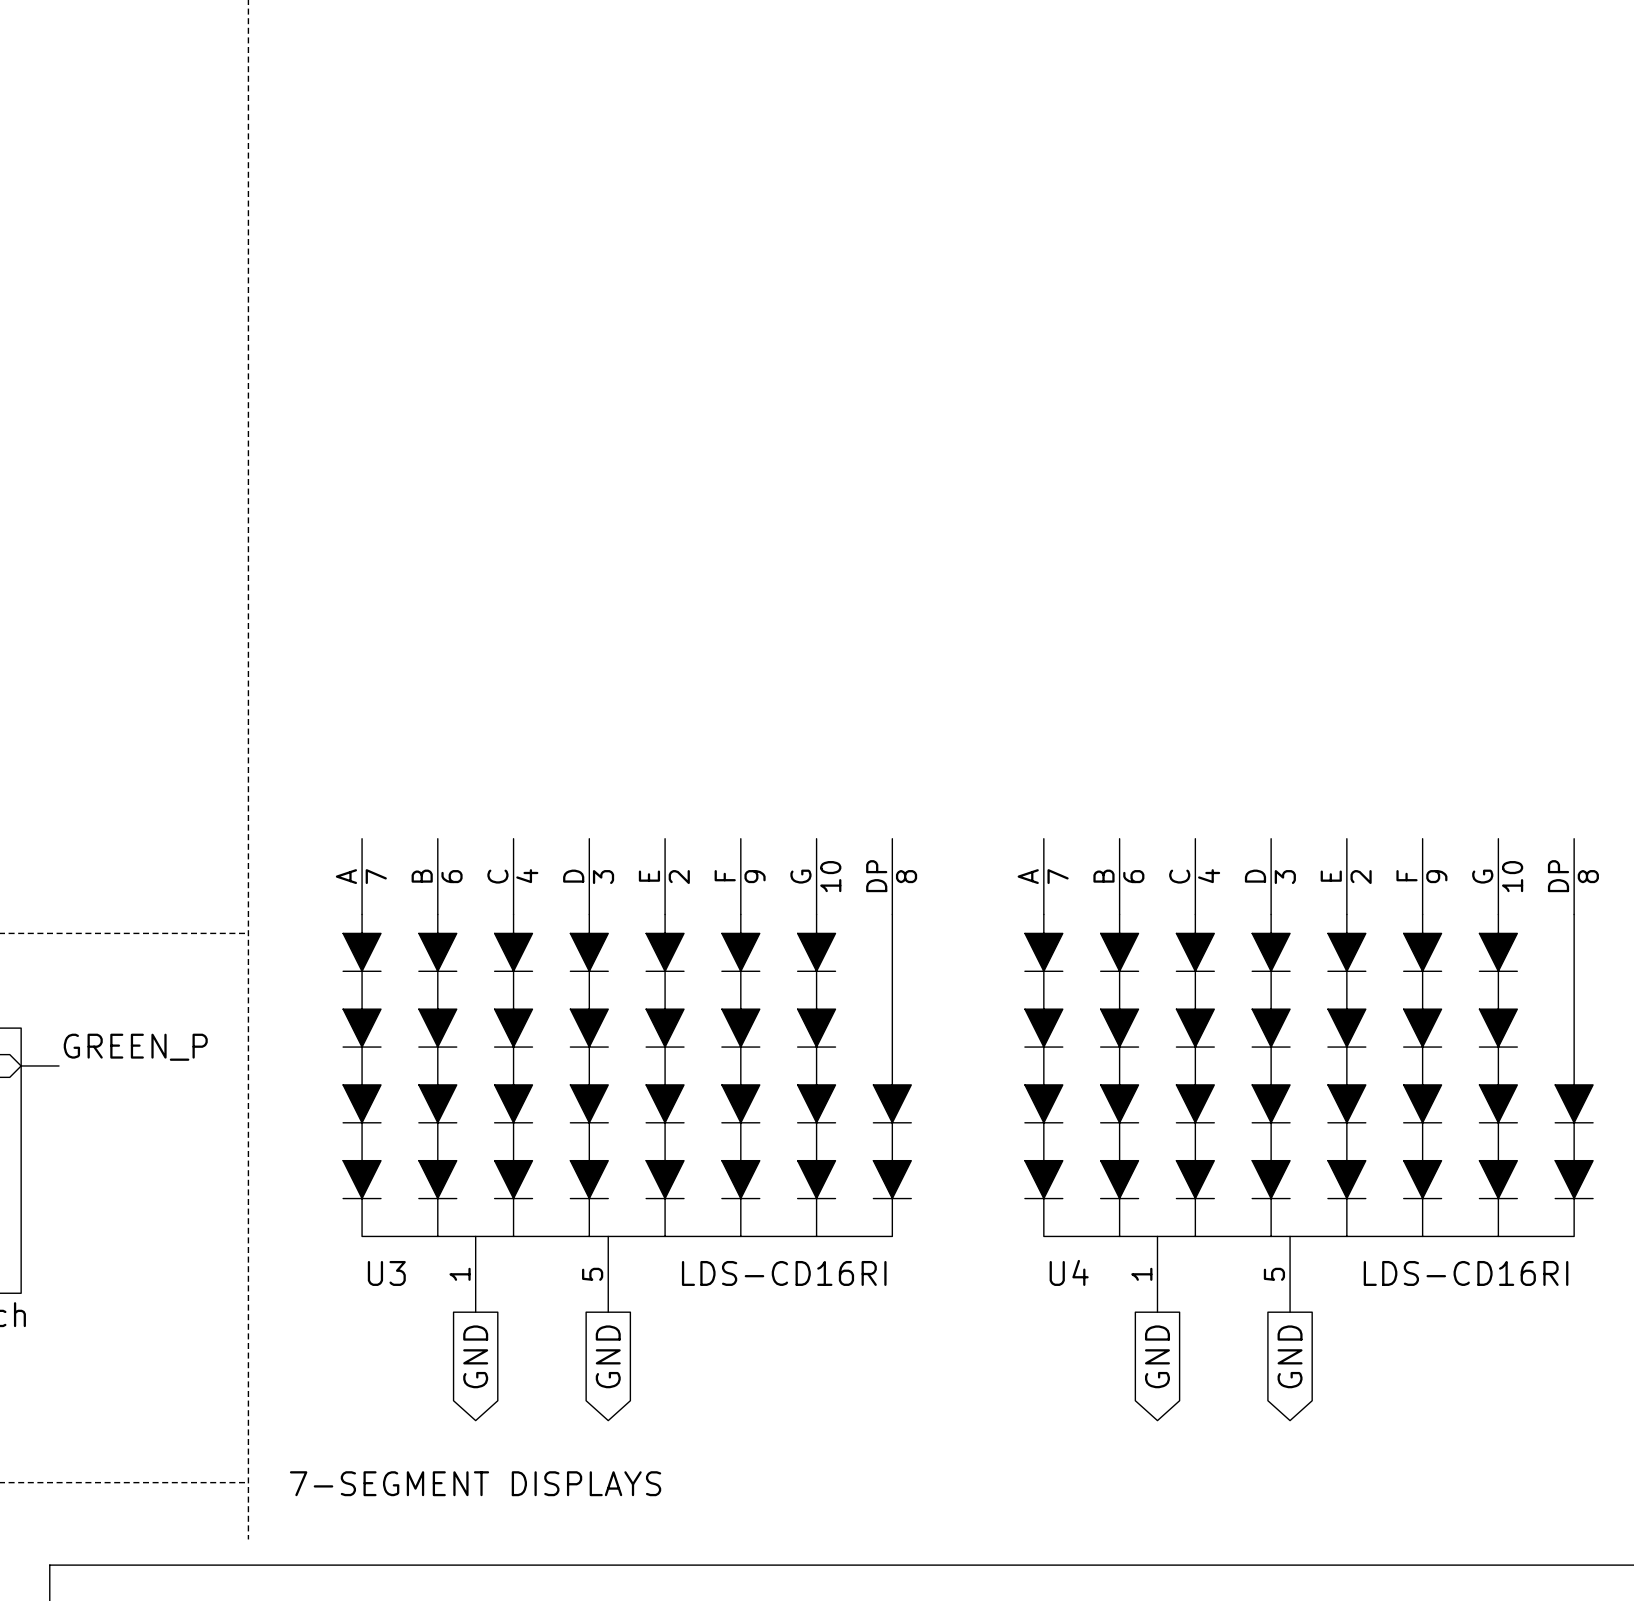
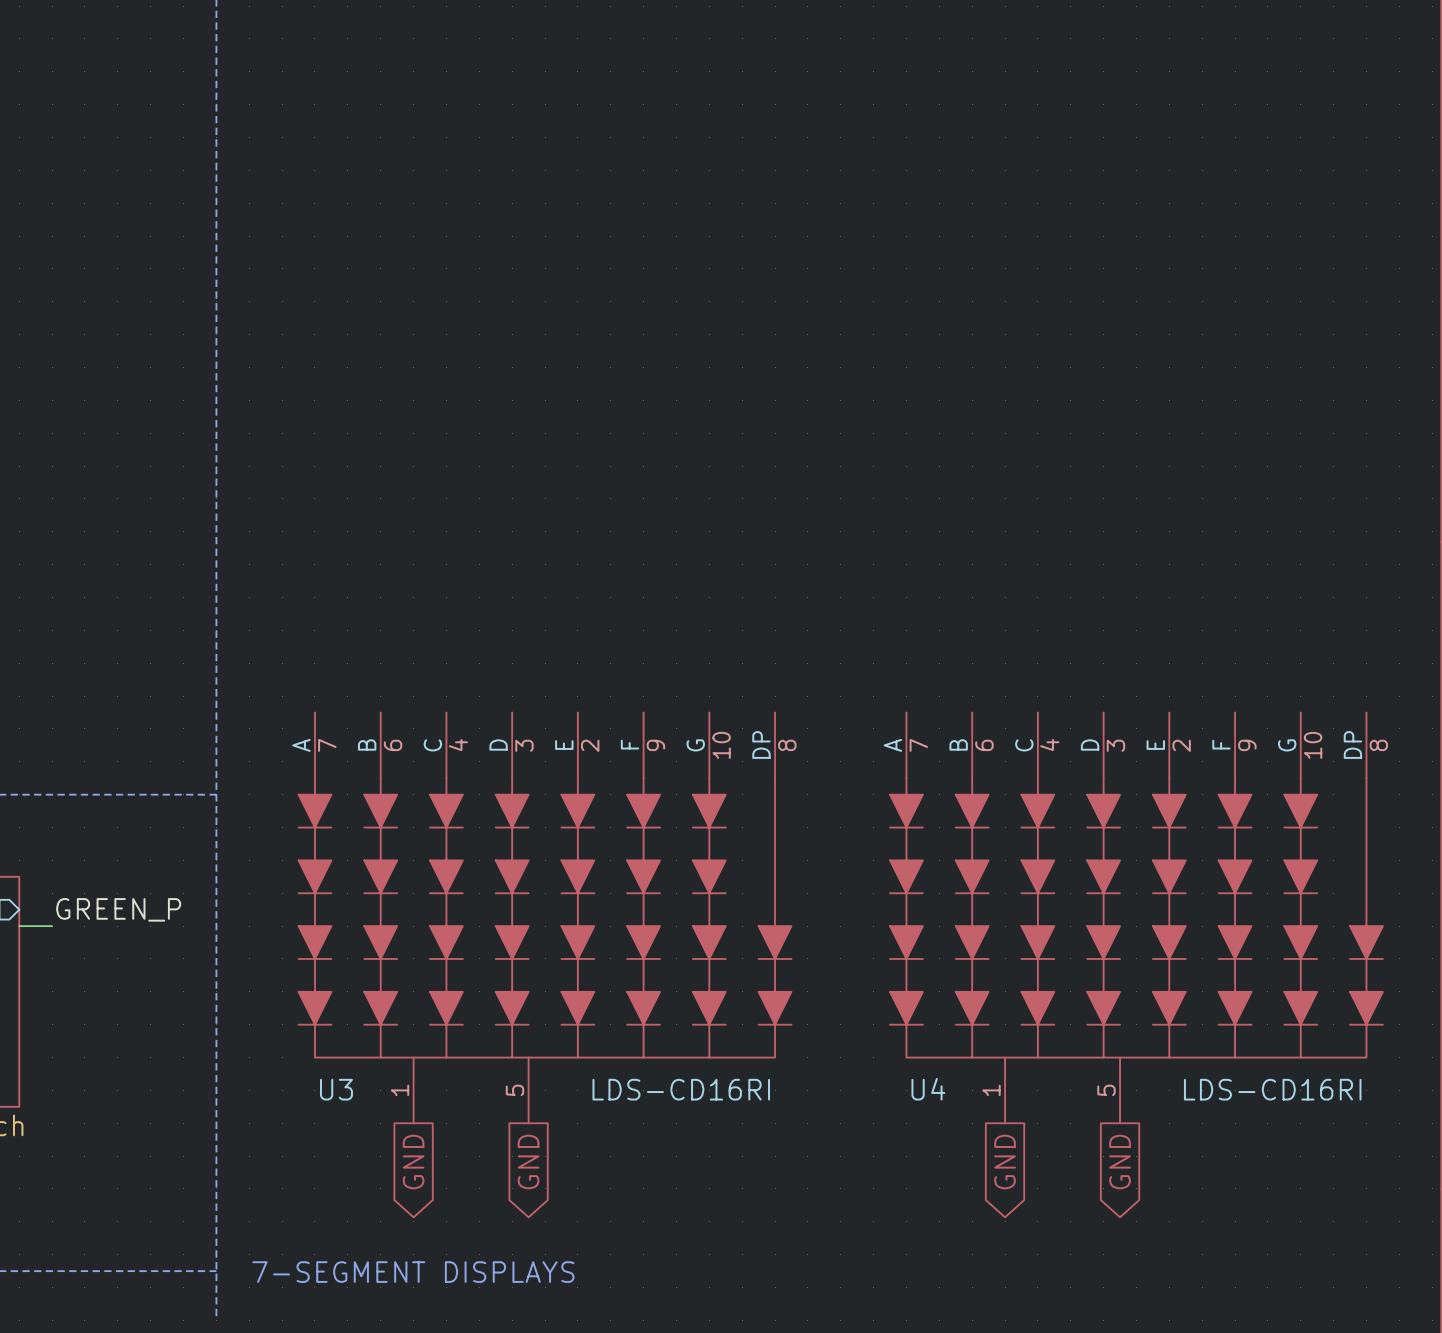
label position: GREEN_P (135, 1047) -> GREEN_P (118, 909)
wire: (21, 1065) (59, 1065) -> (19, 926) (52, 926)

